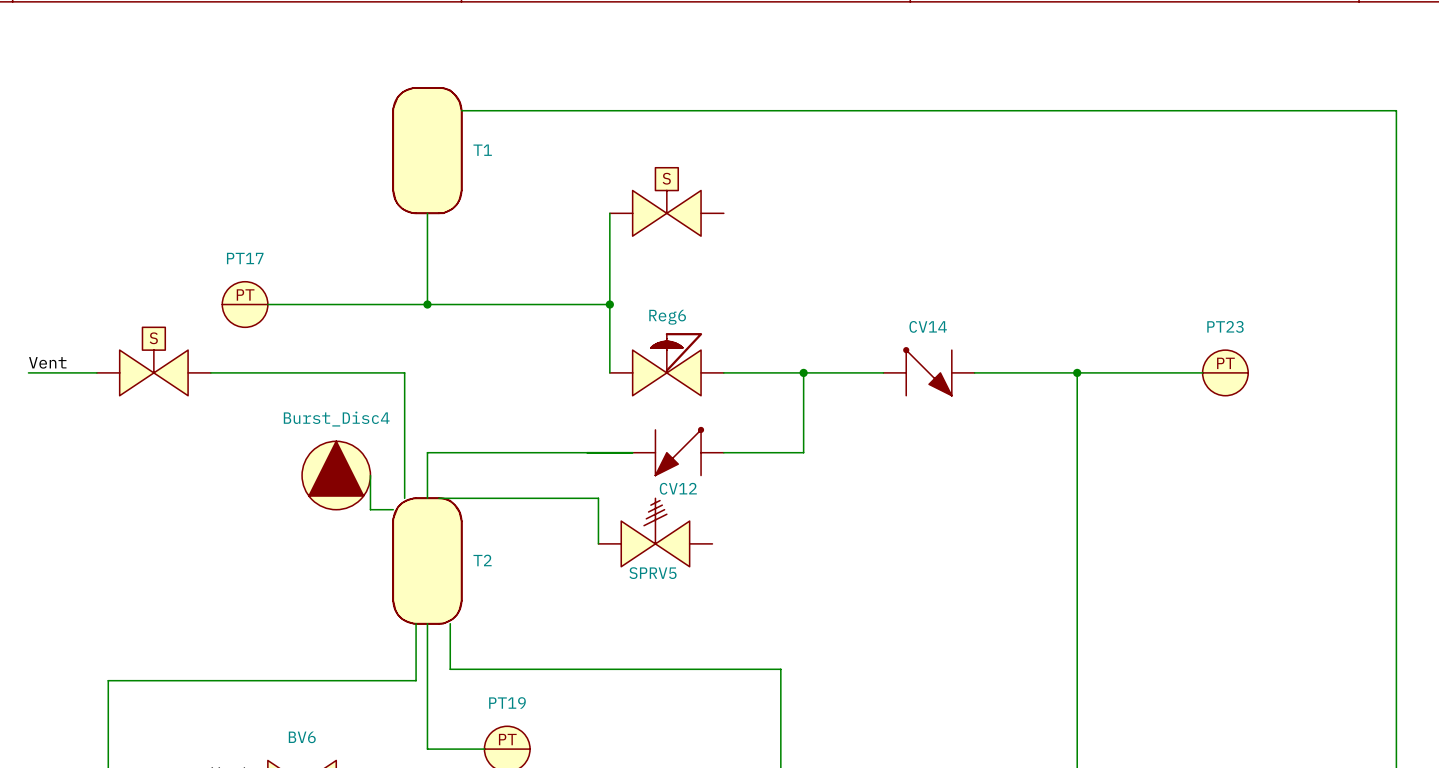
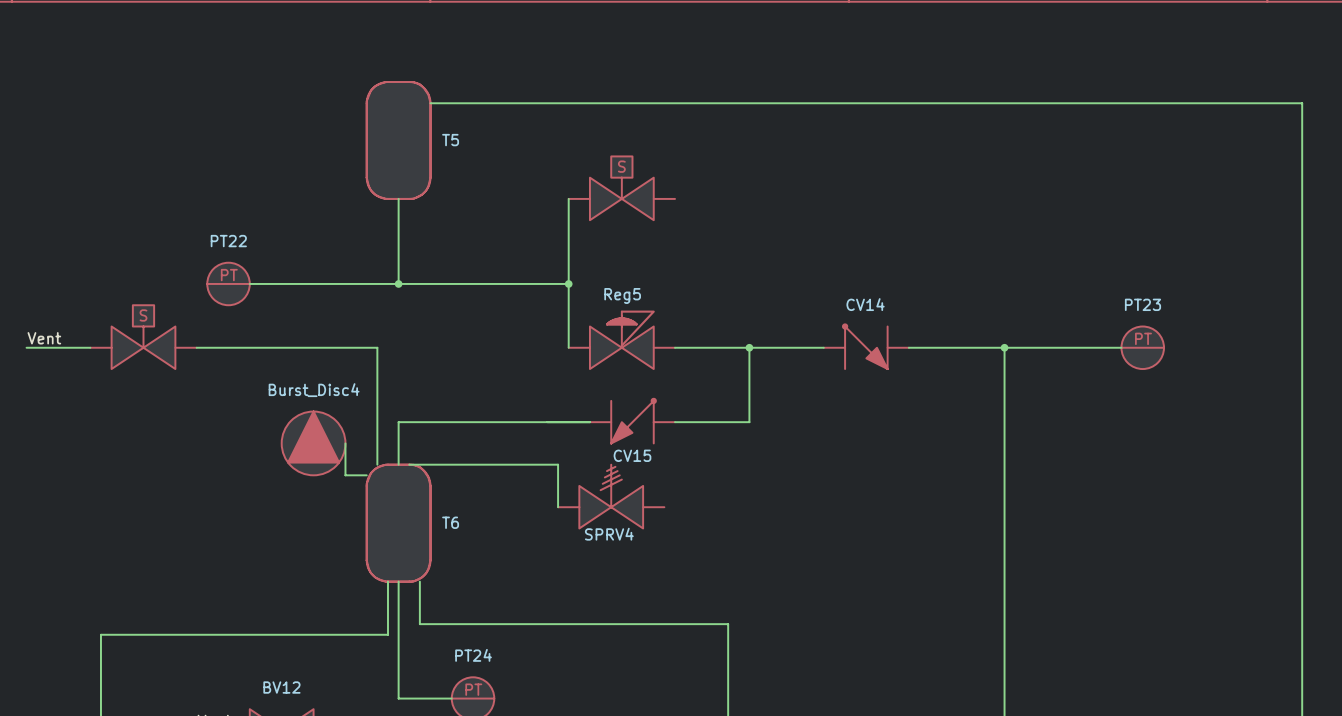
T1 name: T1 (482, 150) -> T5 (450, 140)
PT17 name: PT17 (245, 258) -> PT22 (228, 241)
Reg6 name: Reg6 (667, 317) -> Reg5 (622, 295)
CV12 name: CV12 (678, 488) -> CV15 (632, 455)
T2 name: T2 (482, 560) -> T6 (450, 522)
SPRV5 name: SPRV5 (652, 573) -> SPRV4 (609, 534)
PT19 name: PT19 (507, 702) -> PT24 (473, 655)
BV6 name: BV6 (302, 737) -> BV12 (281, 687)

